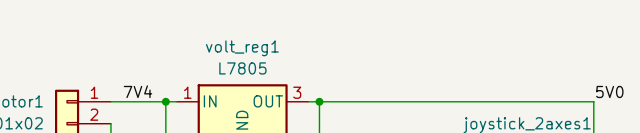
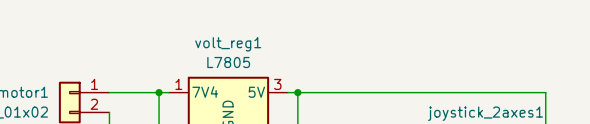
label: 7V4 (137, 91) -> none
label: 5V0 (609, 91) -> none
volt_reg1 pin name: IN (210, 101) -> 7V4 (205, 92)
volt_reg1 pin name: OUT (268, 101) -> 5V (256, 92)

